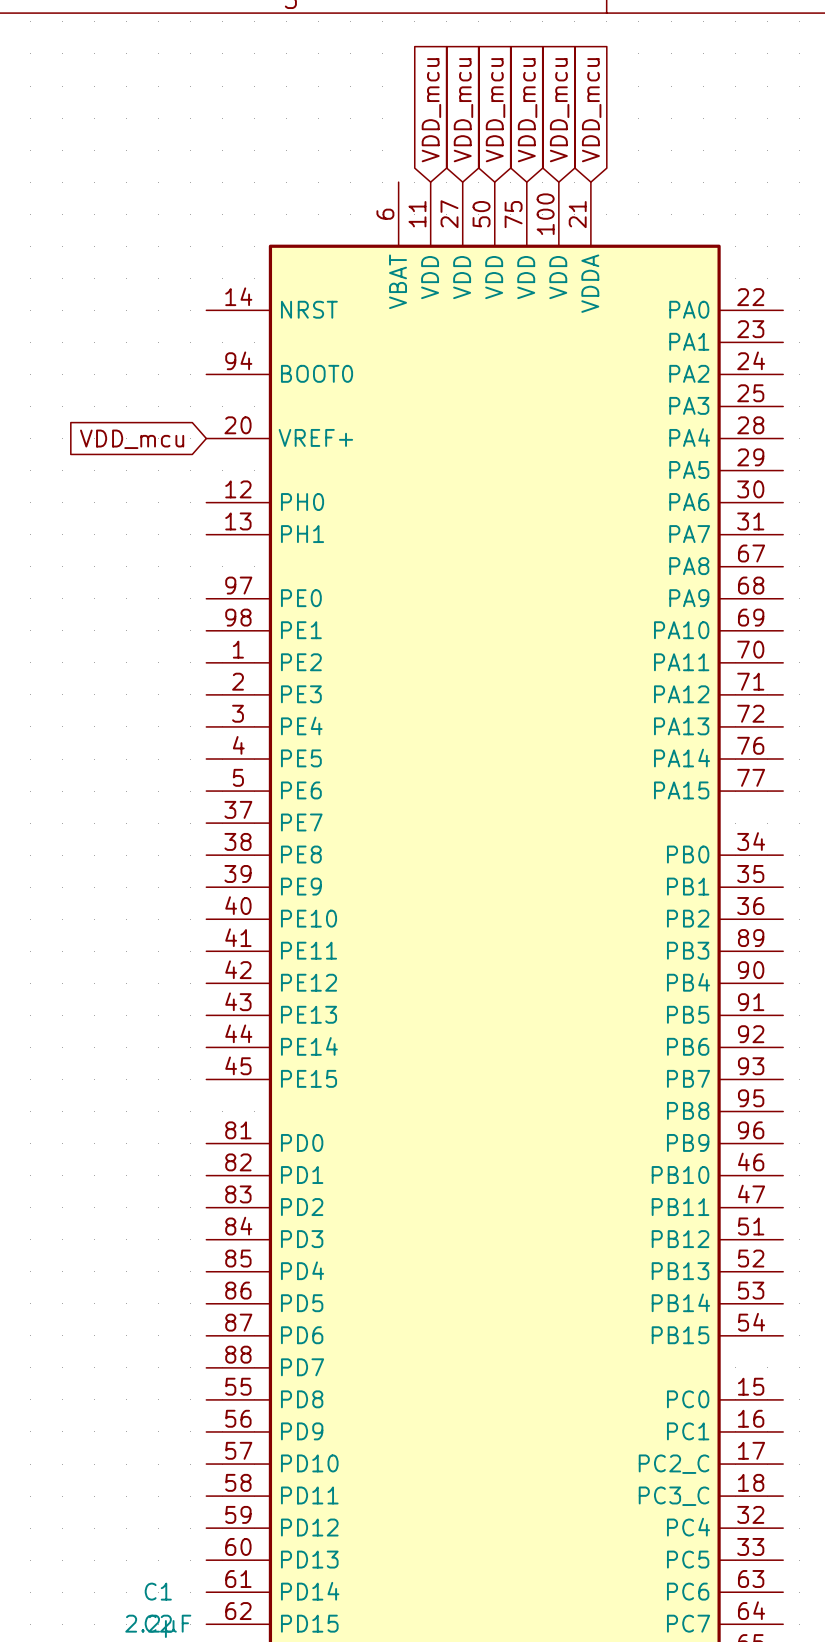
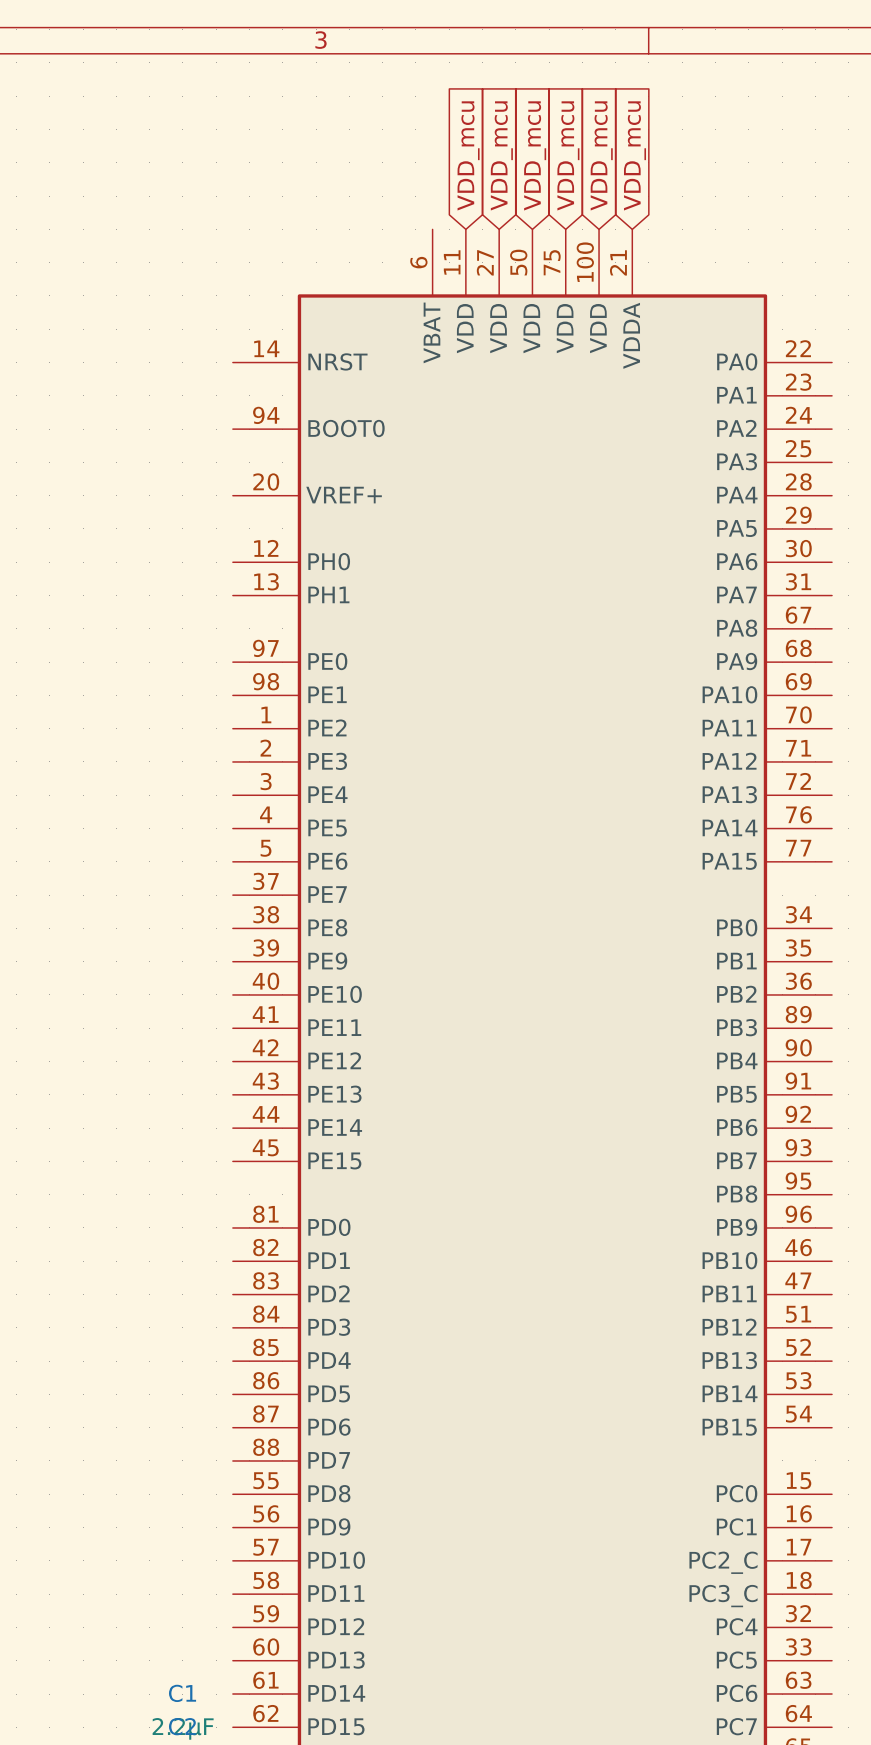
global label: VDD_mcu (132, 439) -> none

